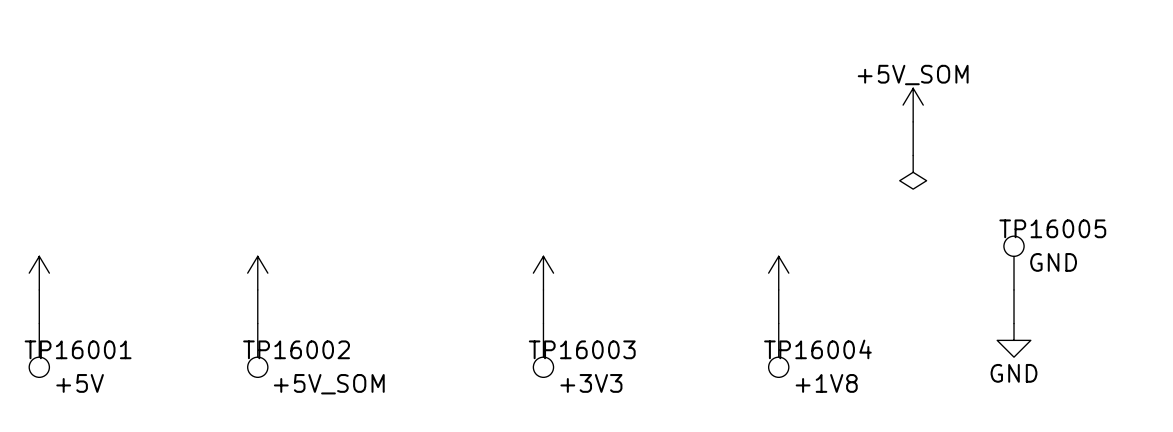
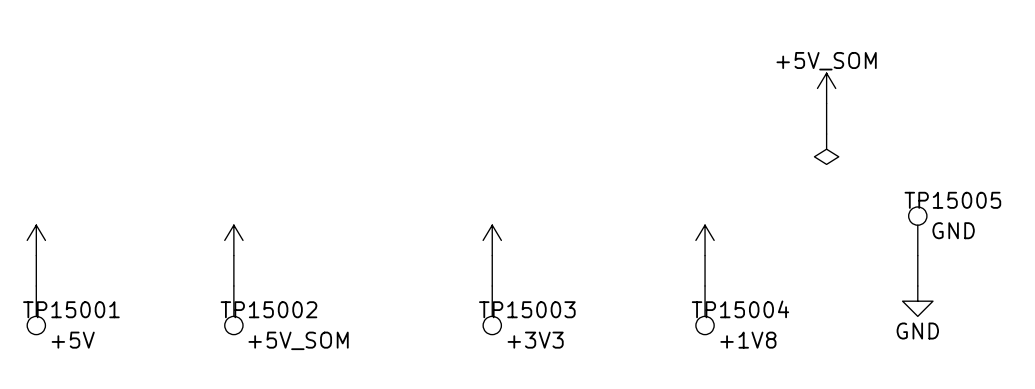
TP16005 name: TP16005 (1052, 228) -> TP15005 (952, 200)
TP16001 name: TP16001 (78, 349) -> TP15001 (71, 309)
TP16002 name: TP16002 (296, 349) -> TP15002 (268, 309)
TP16003 name: TP16003 (582, 349) -> TP15003 (527, 309)
TP16004 name: TP16004 (817, 349) -> TP15004 (740, 309)

